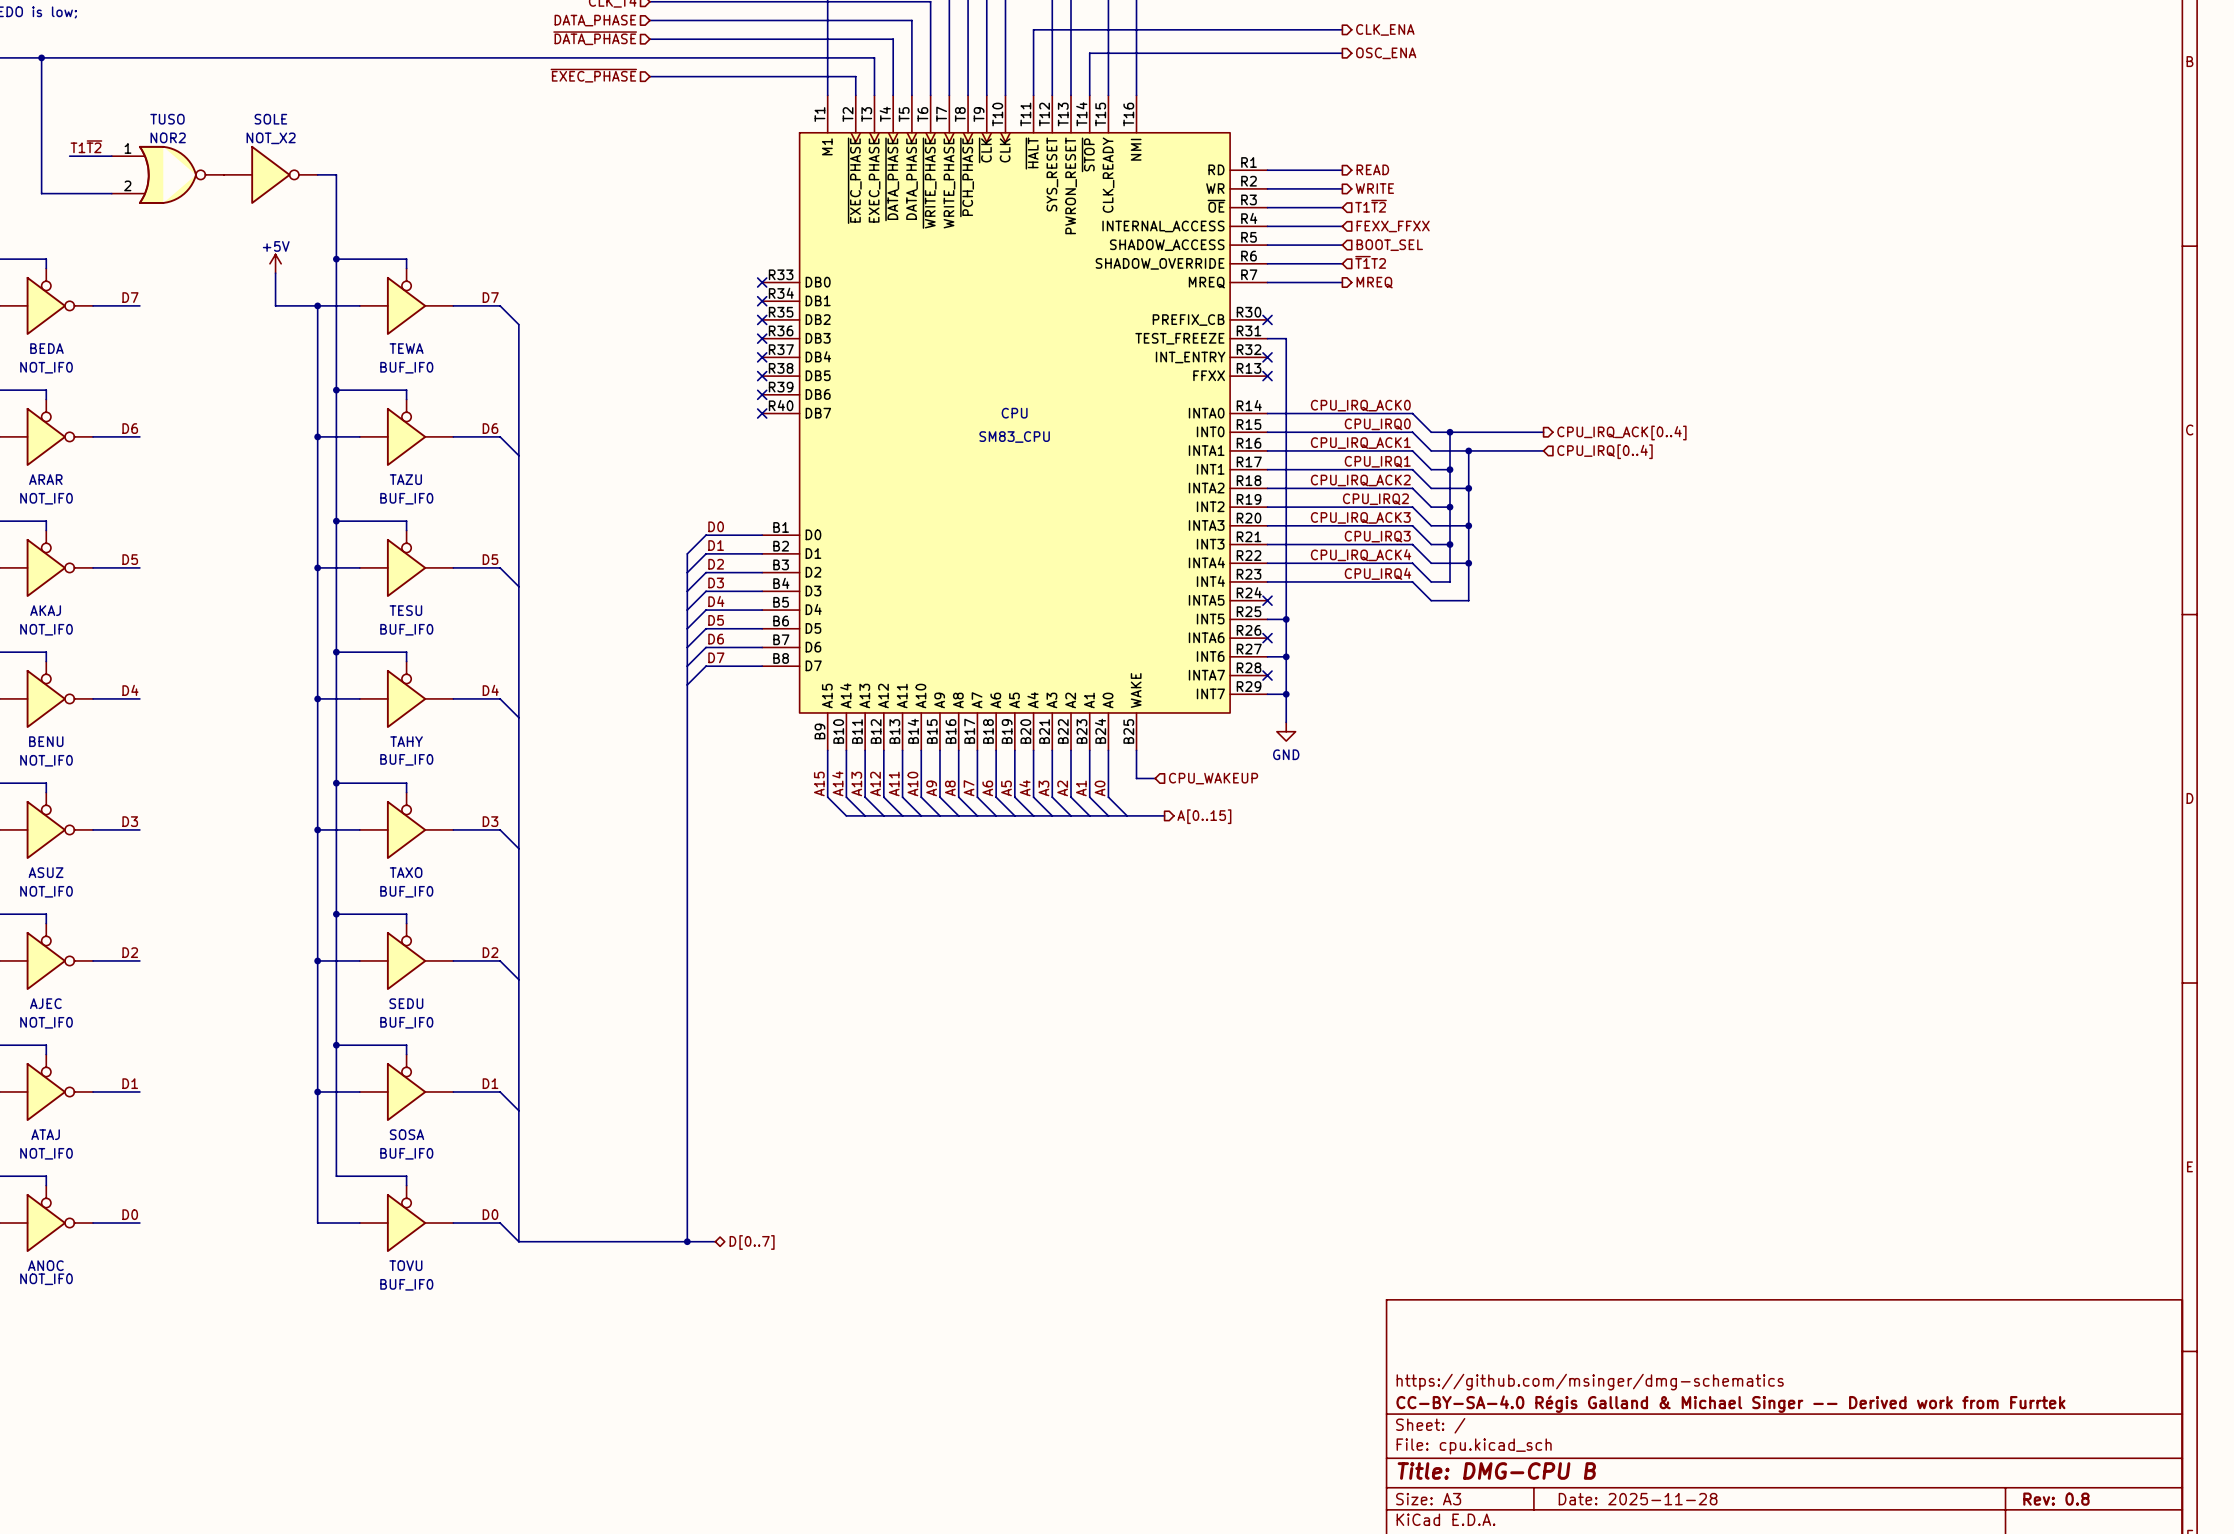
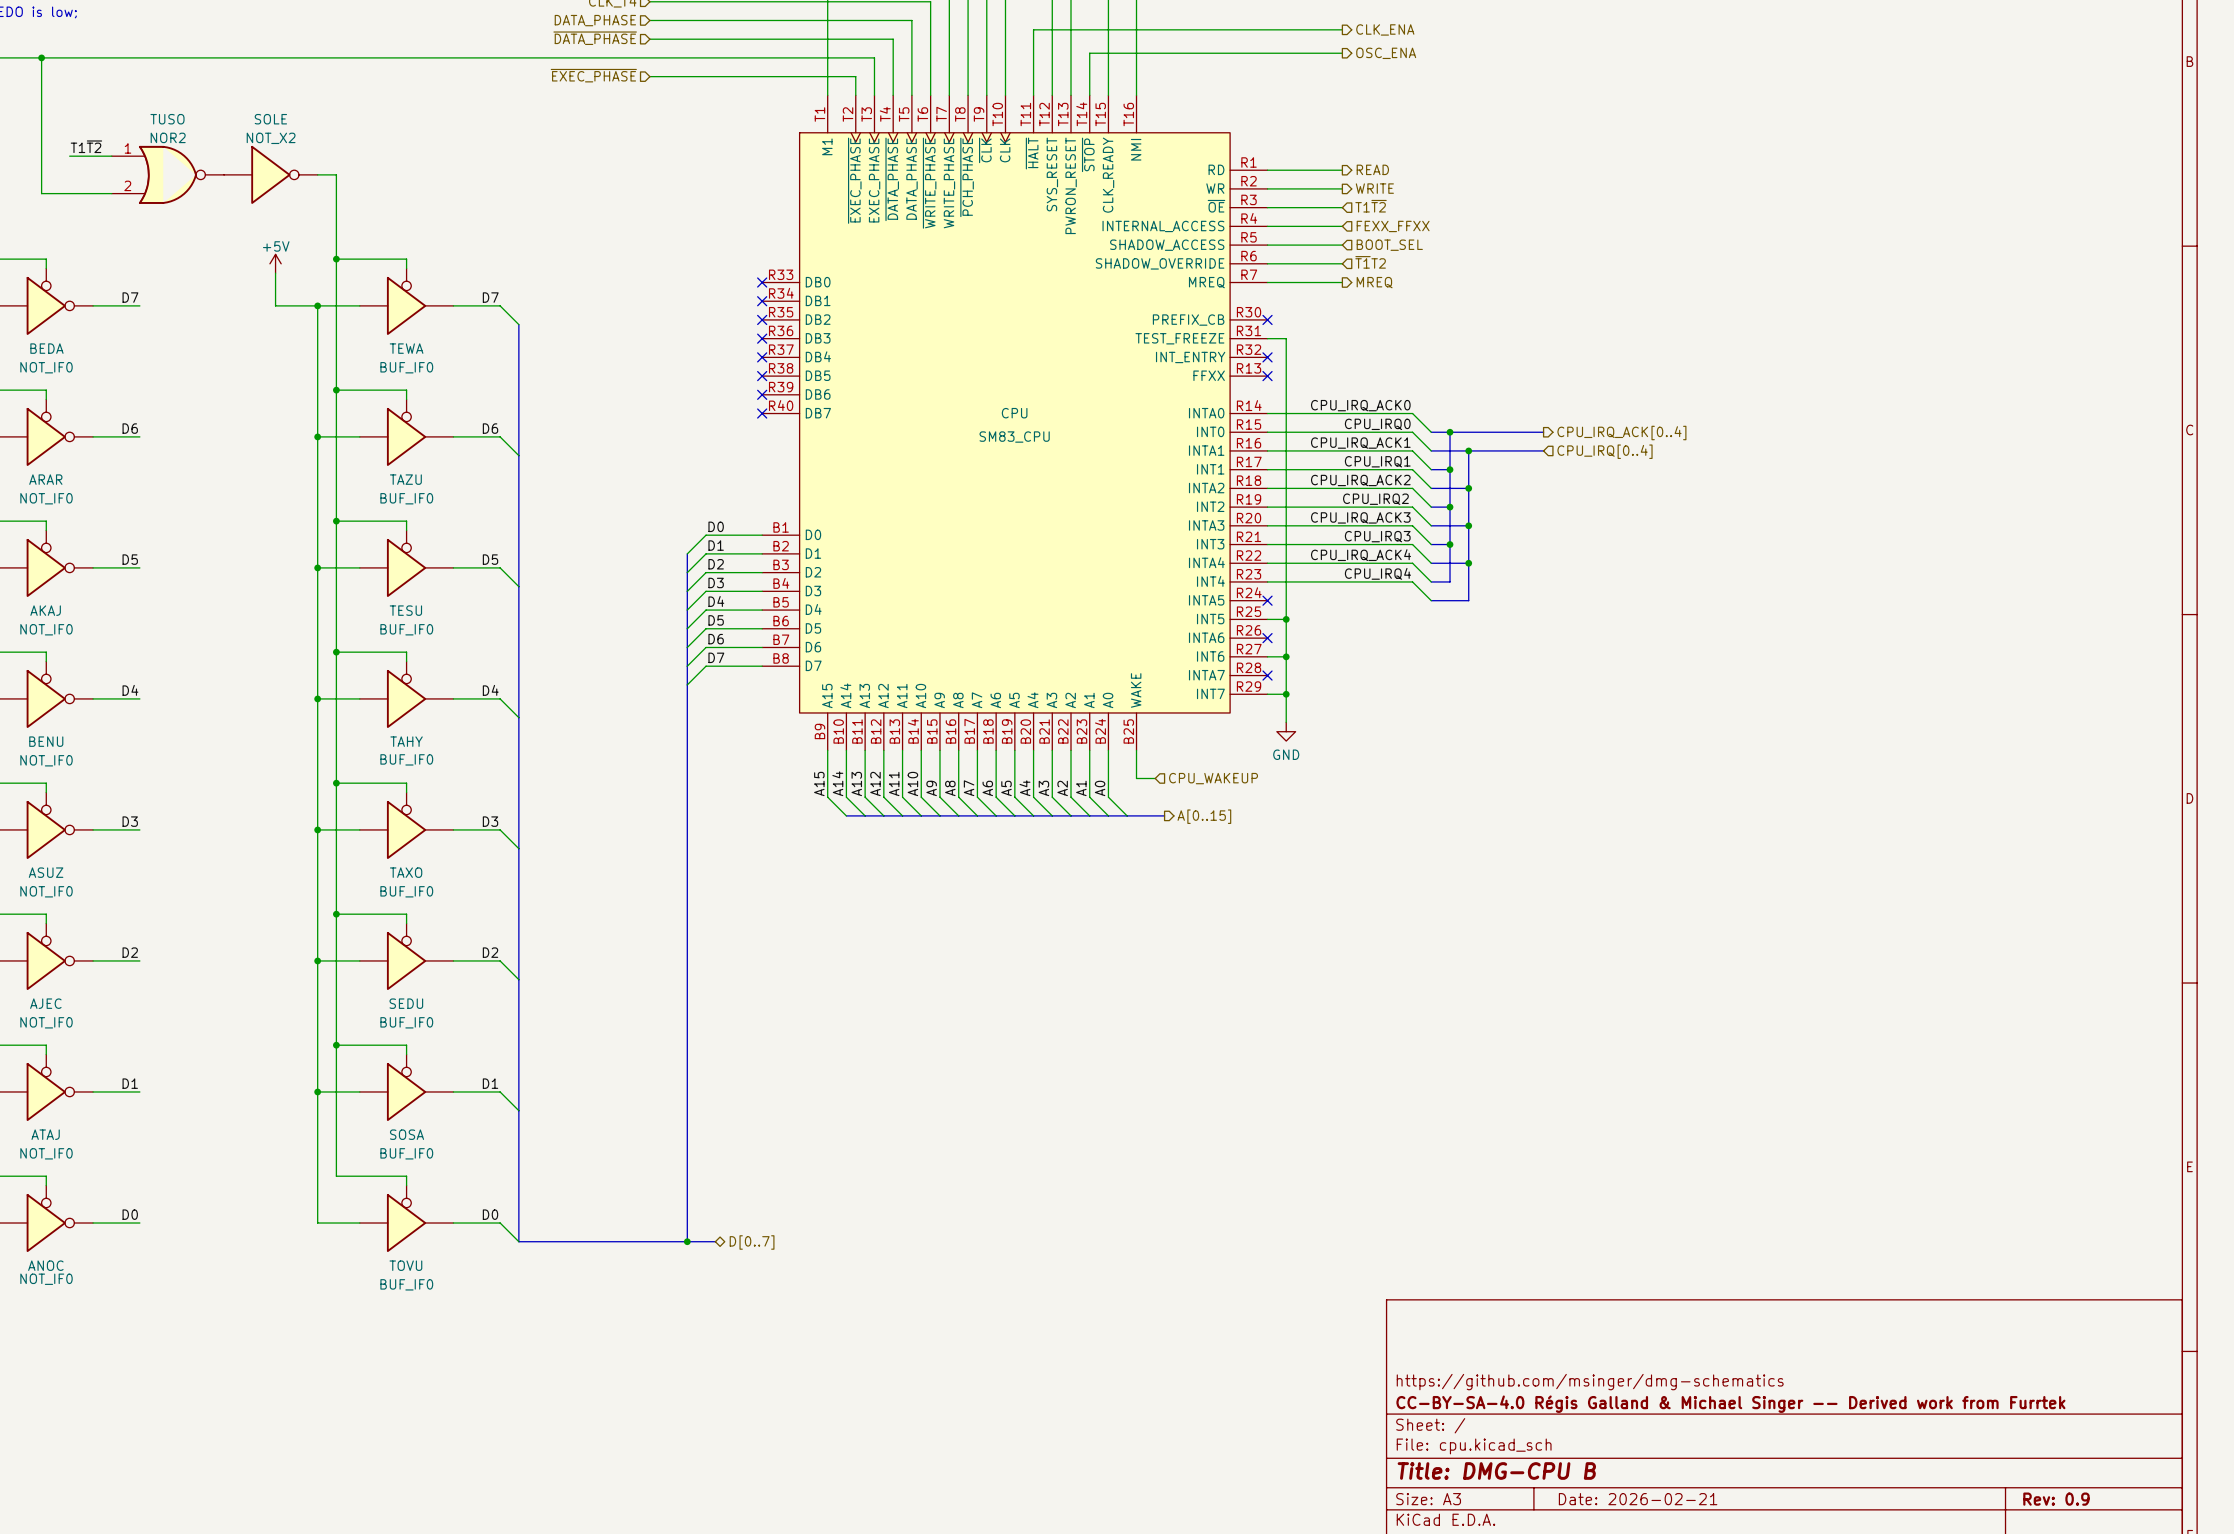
title block: Date: 2025-11-28 (1638, 1499) -> Date: 2026-02-21 (1638, 1499)
title block: Rev: 0.8 (2056, 1499) -> Rev: 0.9 (2056, 1499)

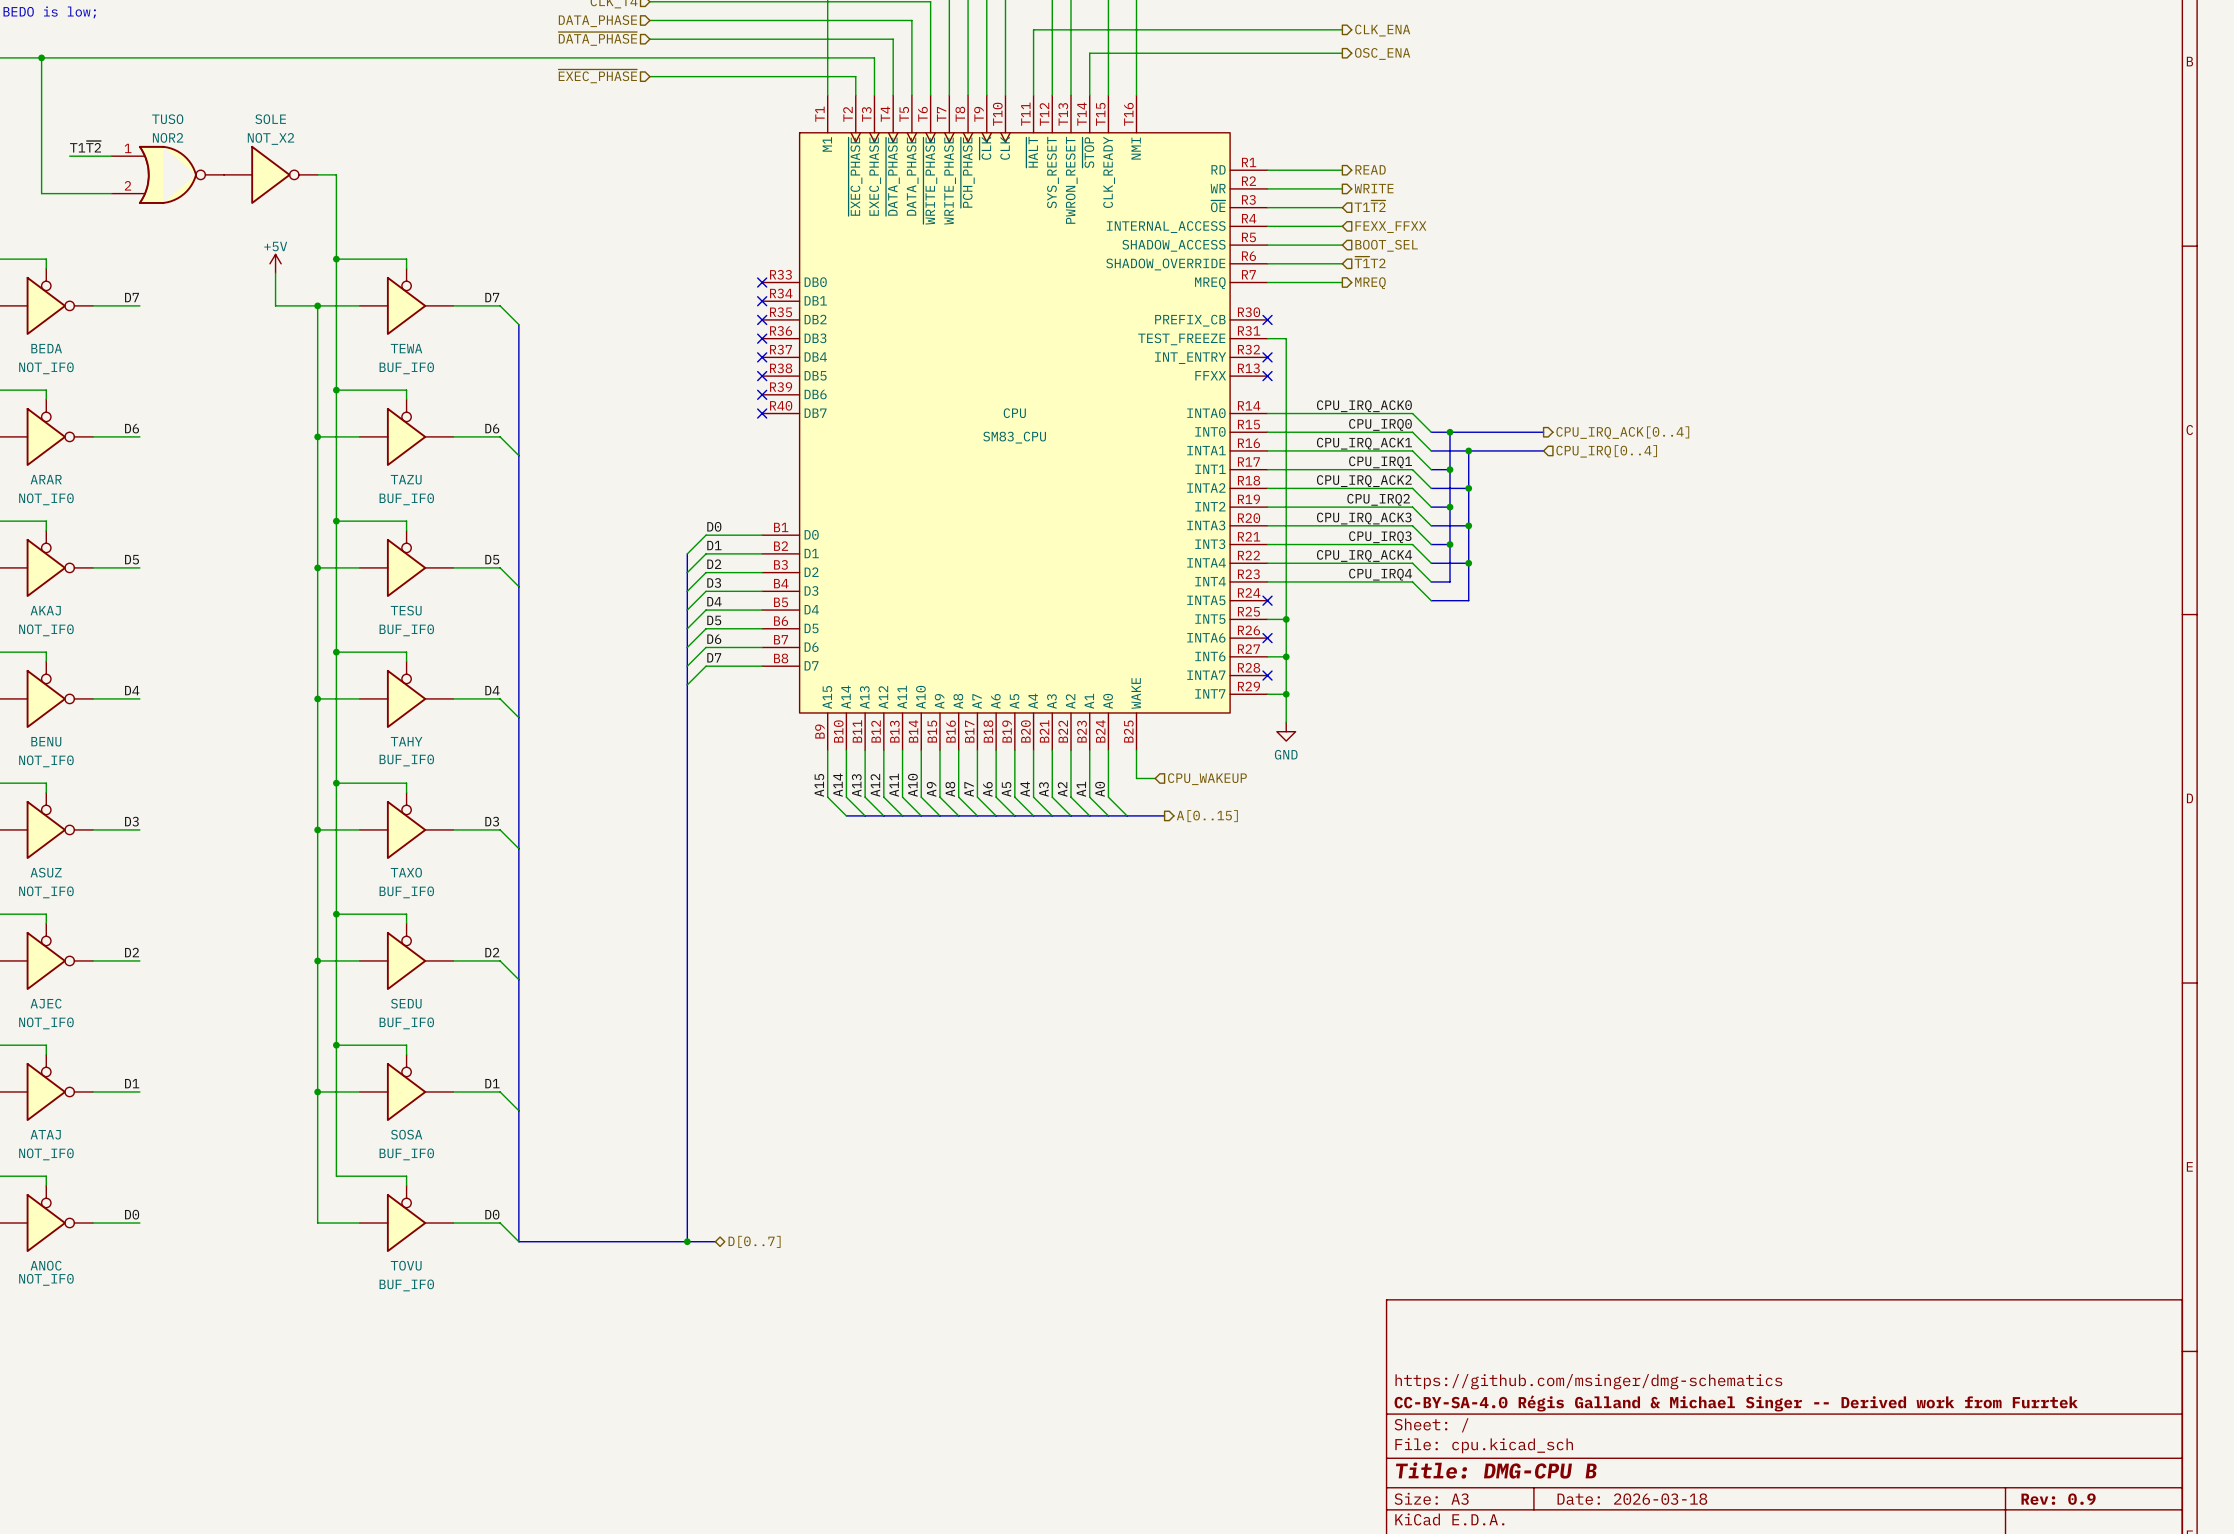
title block: Date: 2026-02-21 (1638, 1499) -> Date: 2026-03-18 (1632, 1499)

